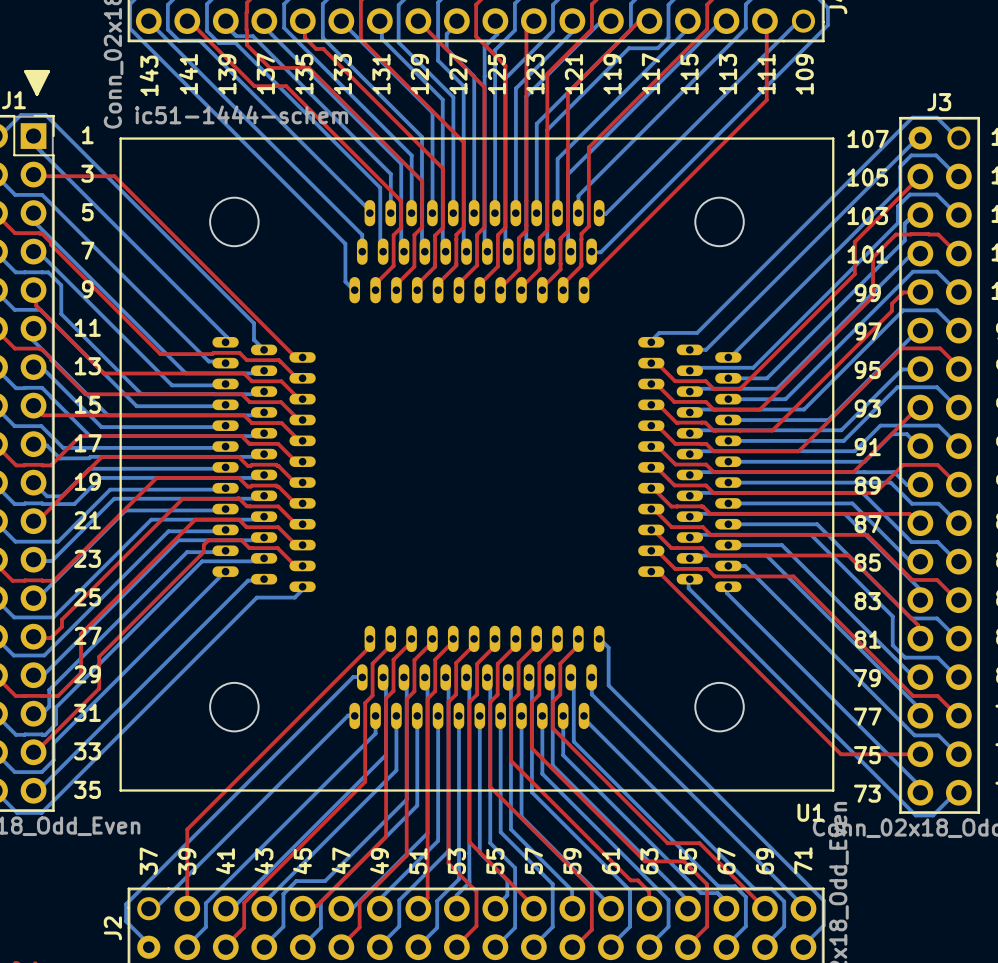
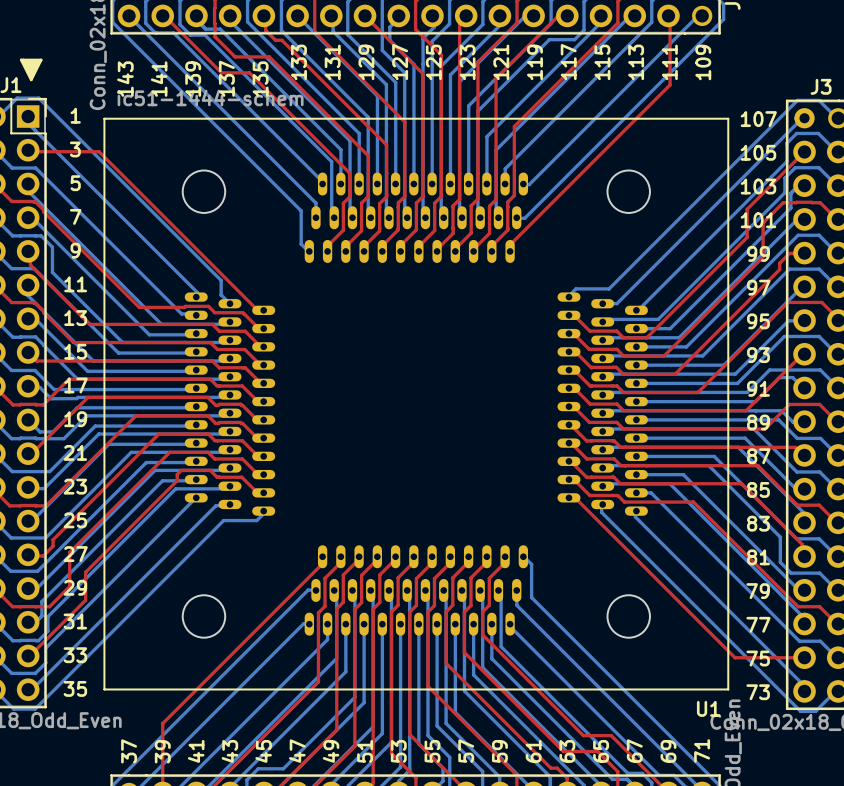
text position: 137 (265, 73) -> 137 (226, 78)
text position: 141 (188, 74) -> 141 (159, 79)
text position: 139 (227, 74) -> 139 (193, 79)
text position: 135 (304, 74) -> 135 (260, 79)
text position: 143 (149, 75) -> 143 (125, 79)

